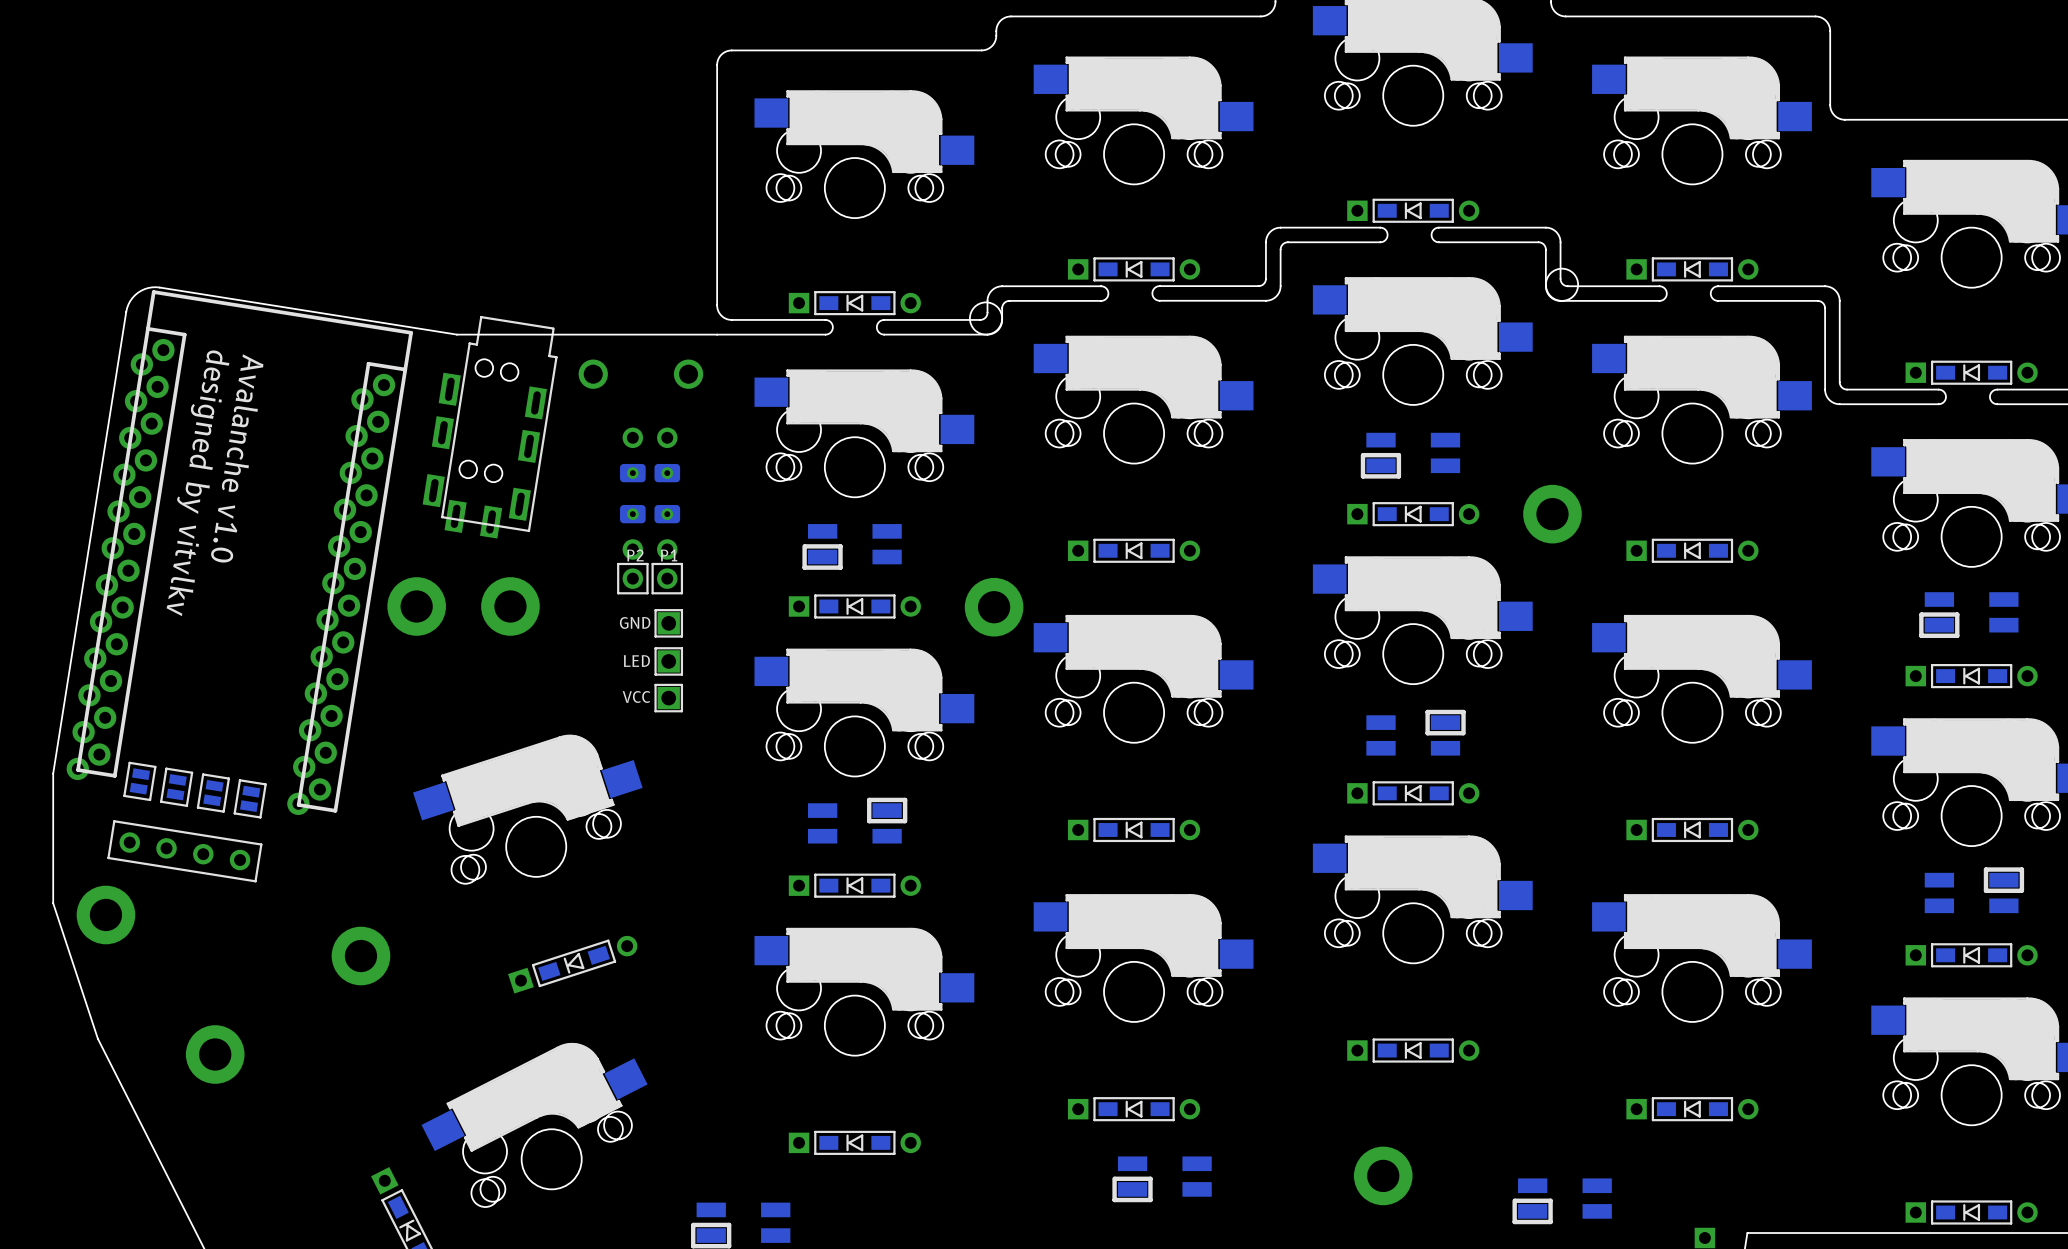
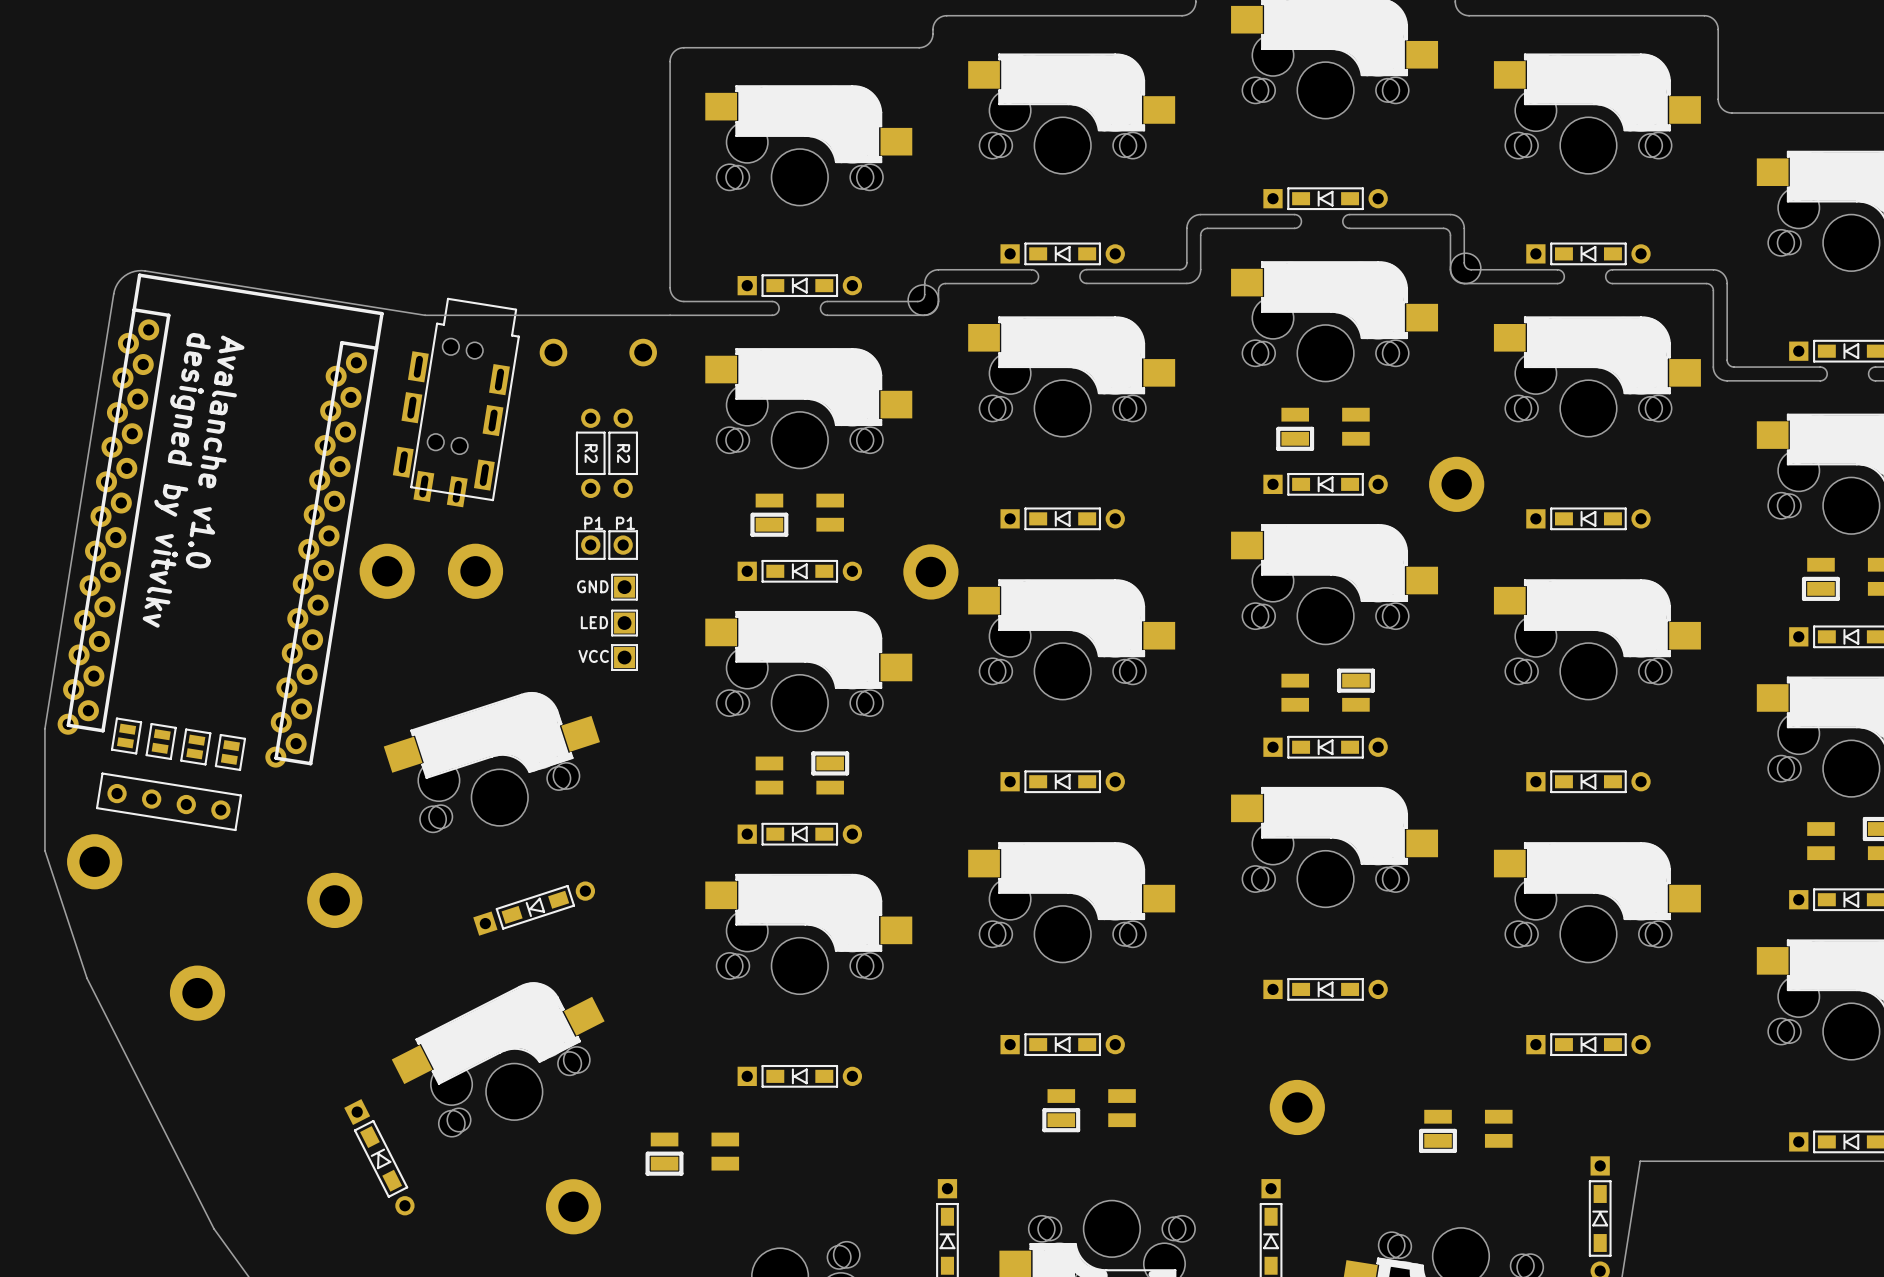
part footprint: [620, 427, 646, 560] -> [575, 408, 606, 498]
part footprint: [654, 427, 681, 560] -> [608, 408, 639, 498]
part text: P2 (635, 555) -> P1 (593, 523)

